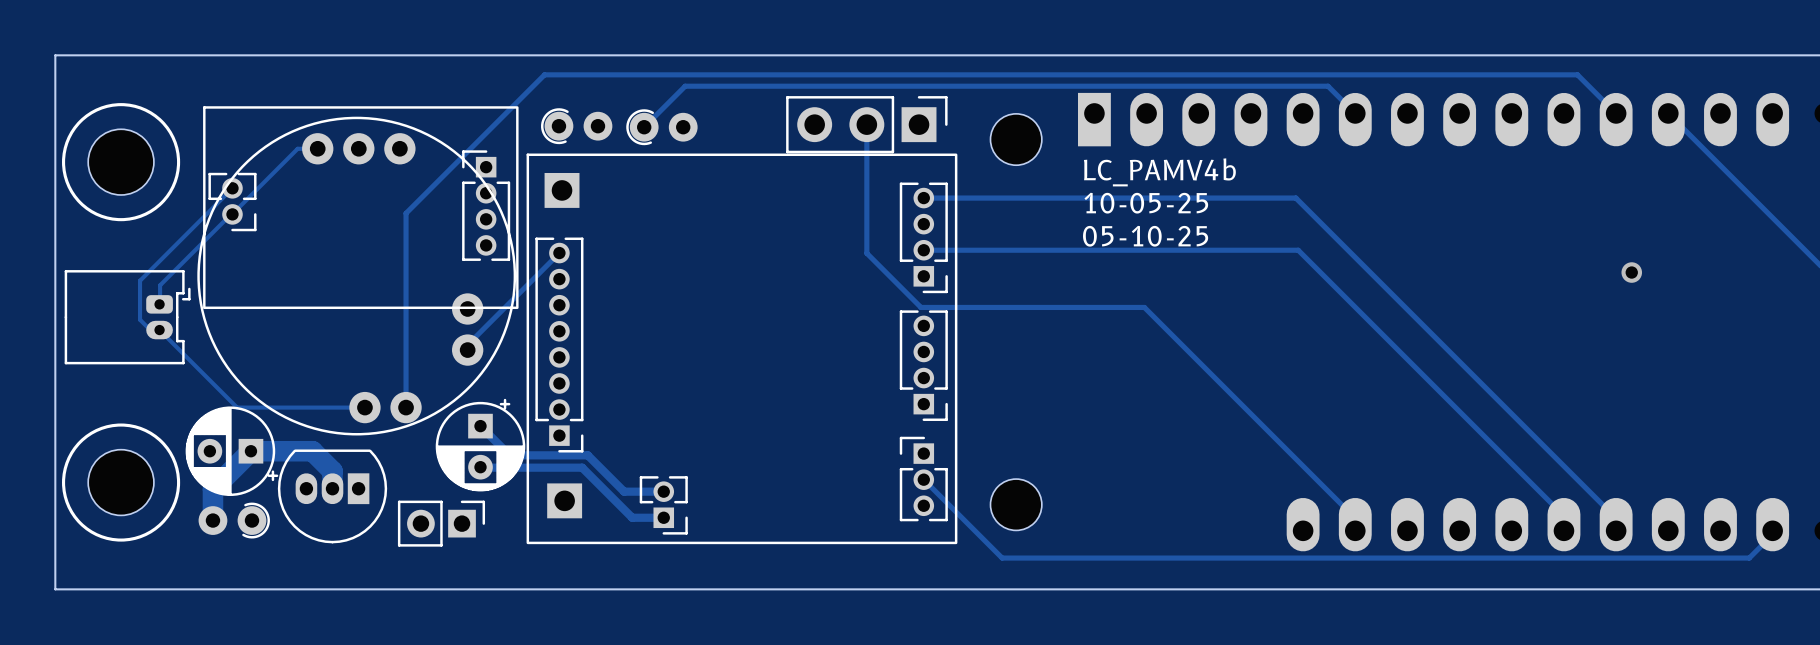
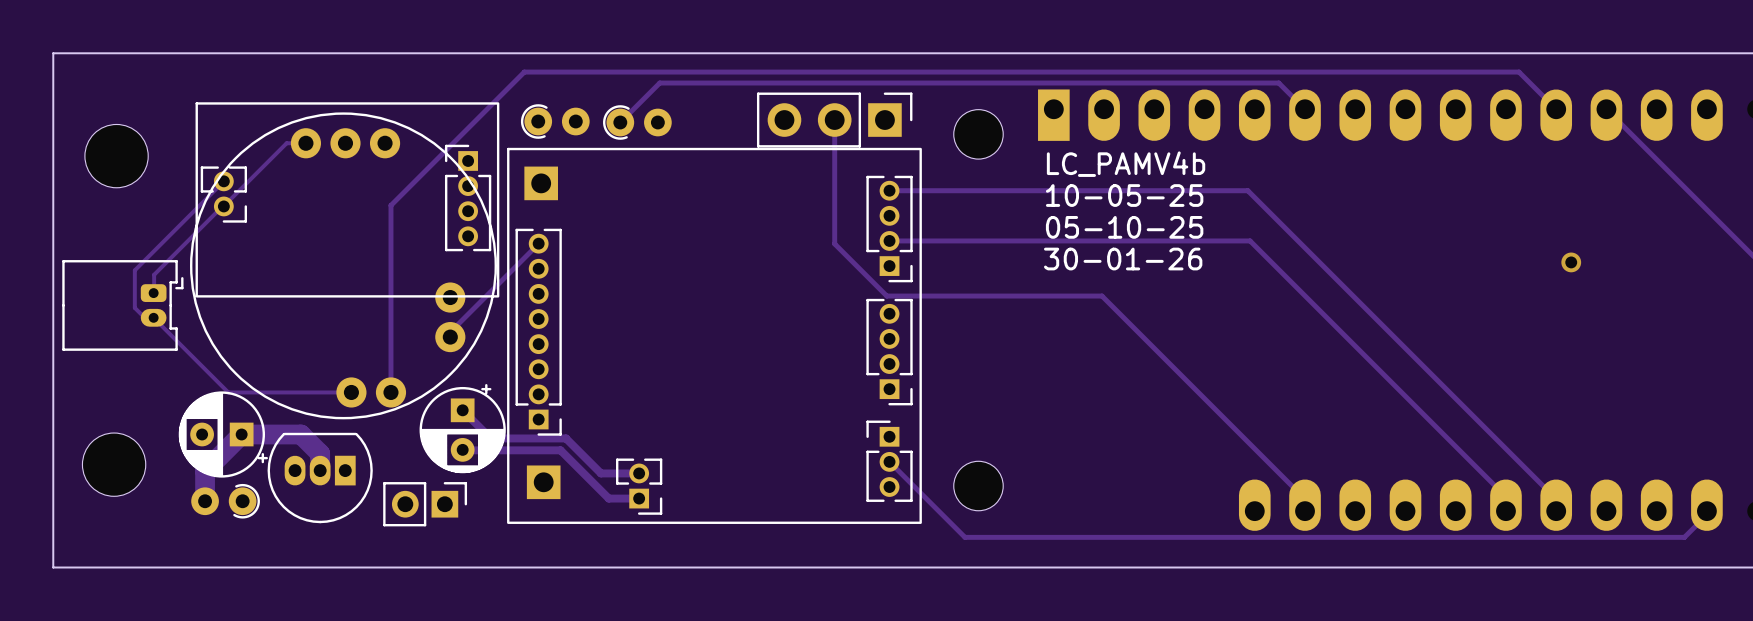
part footprint: [62, 103, 181, 222] -> [84, 124, 149, 188]
text: none -> 30-01-26 (1123, 259)
part footprint: [62, 423, 181, 542] -> [82, 433, 146, 497]

